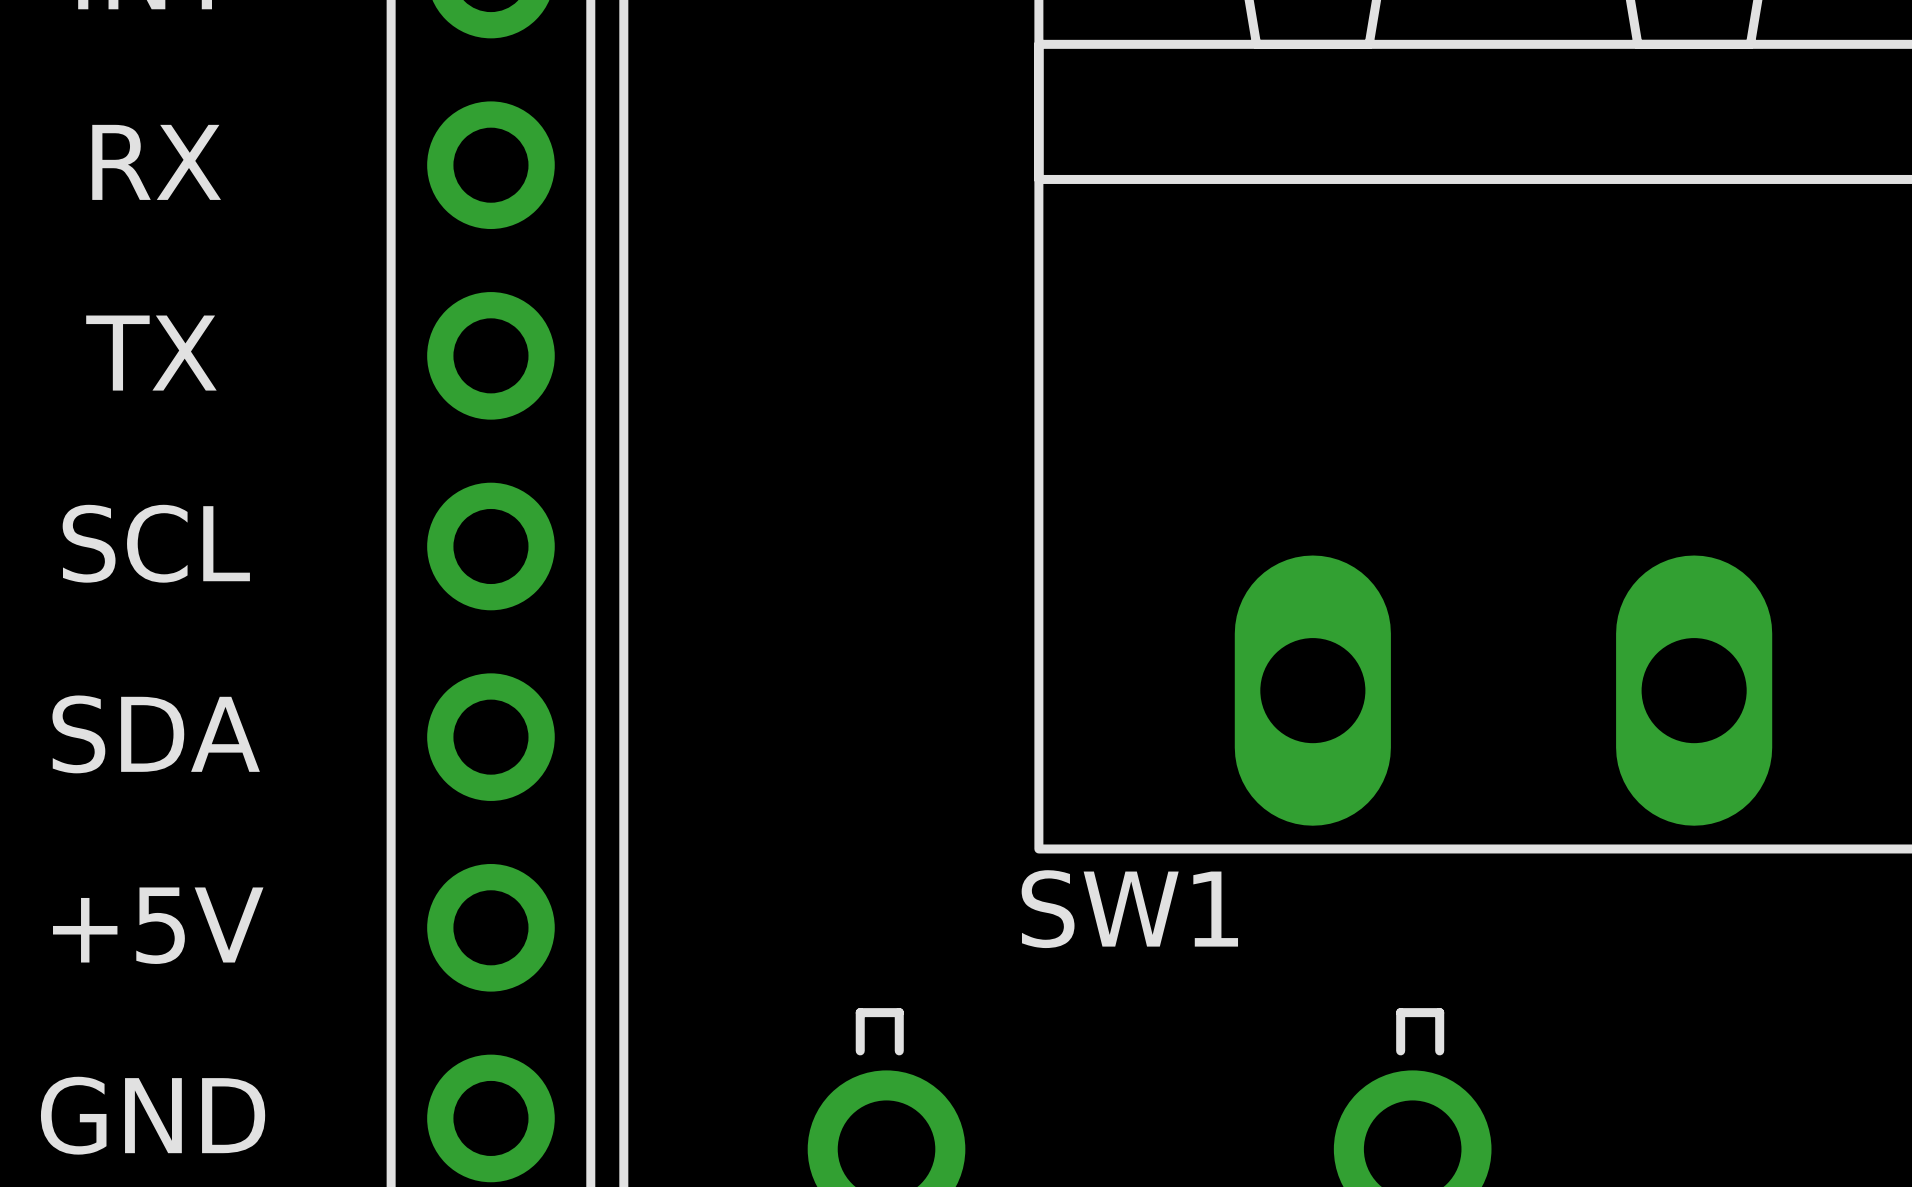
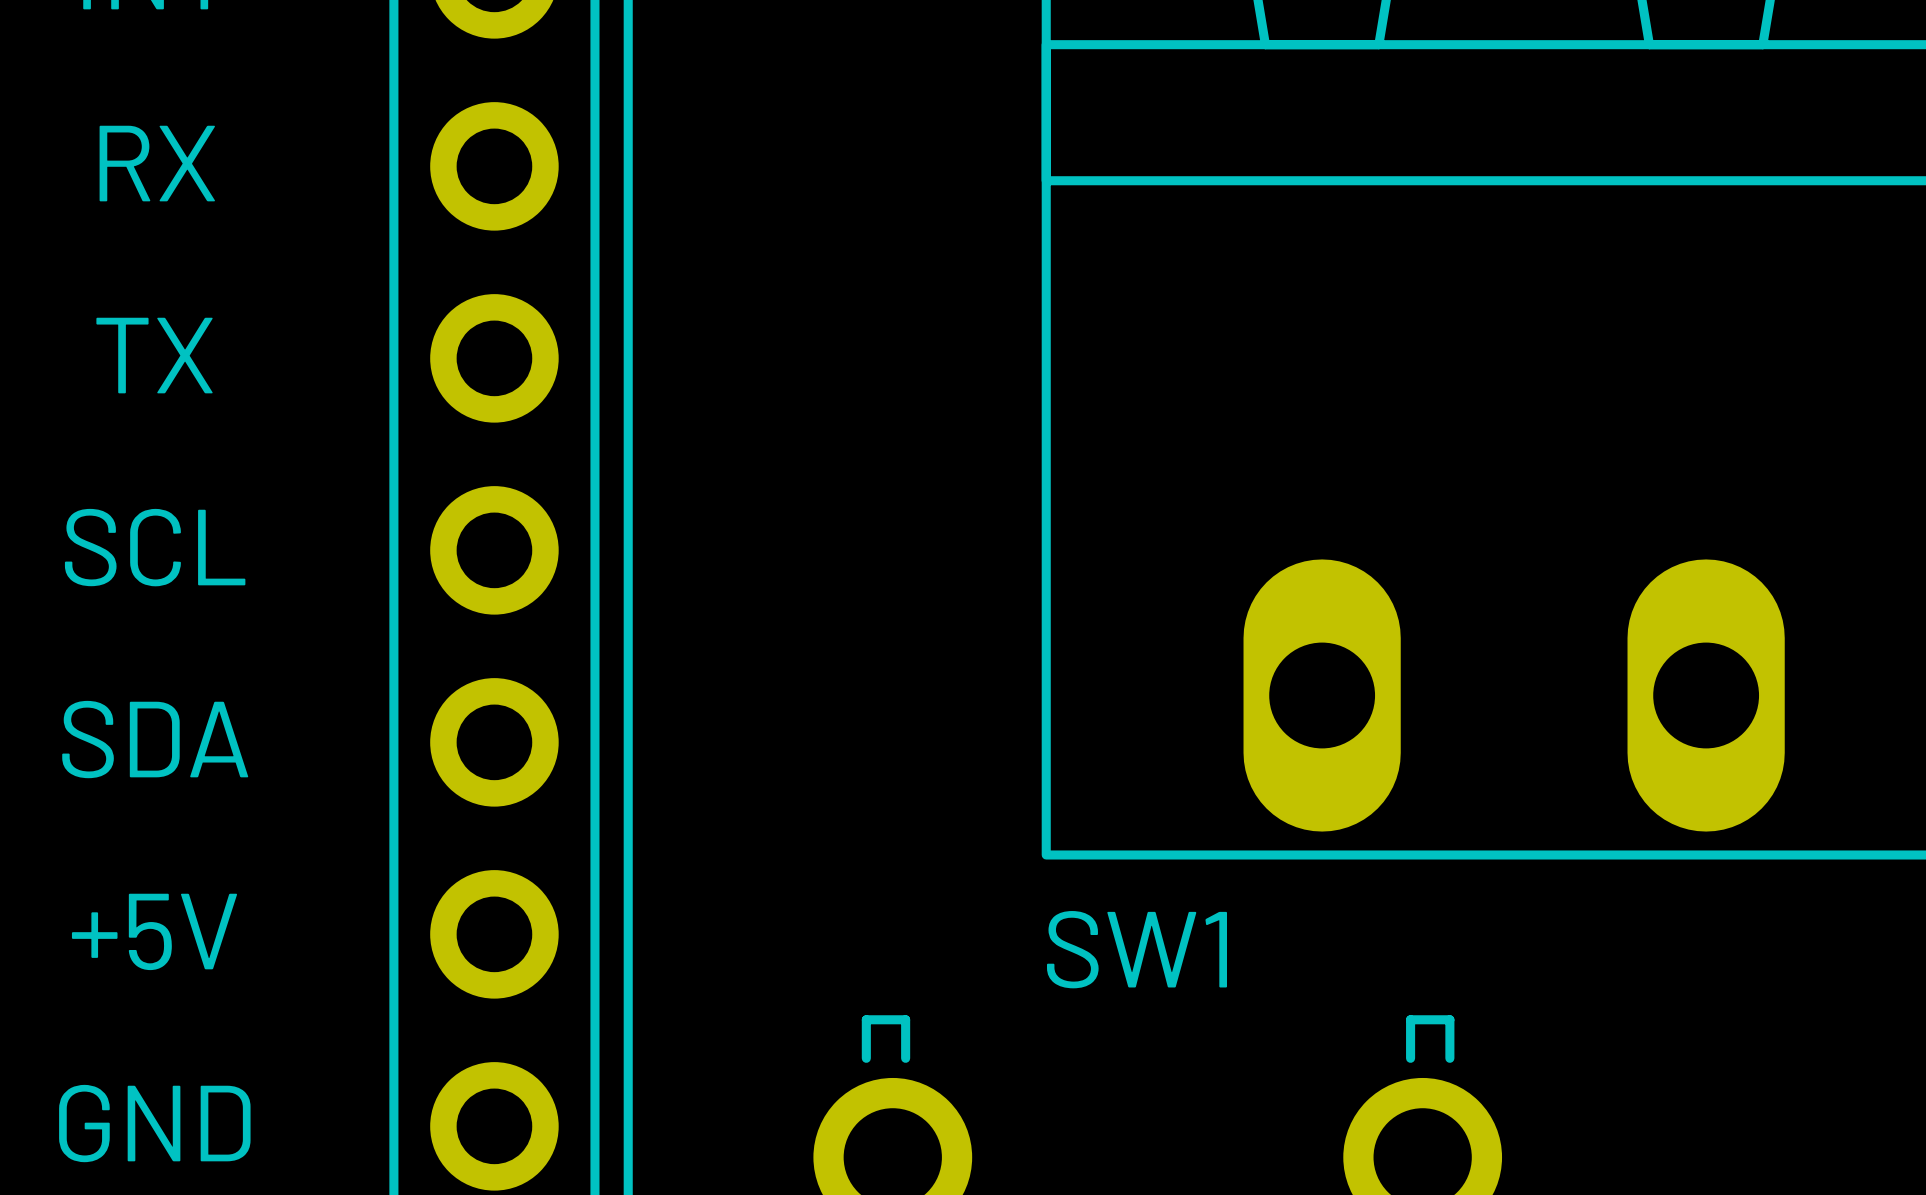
text position: SW1 (1129, 909) -> SW1 (1137, 949)

